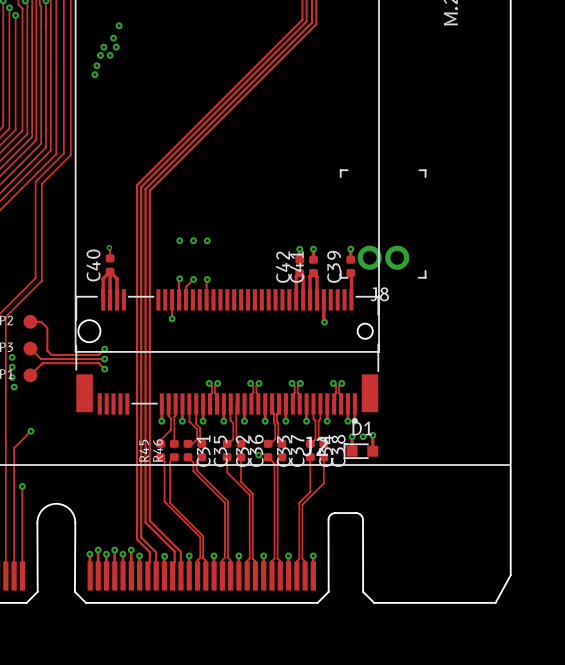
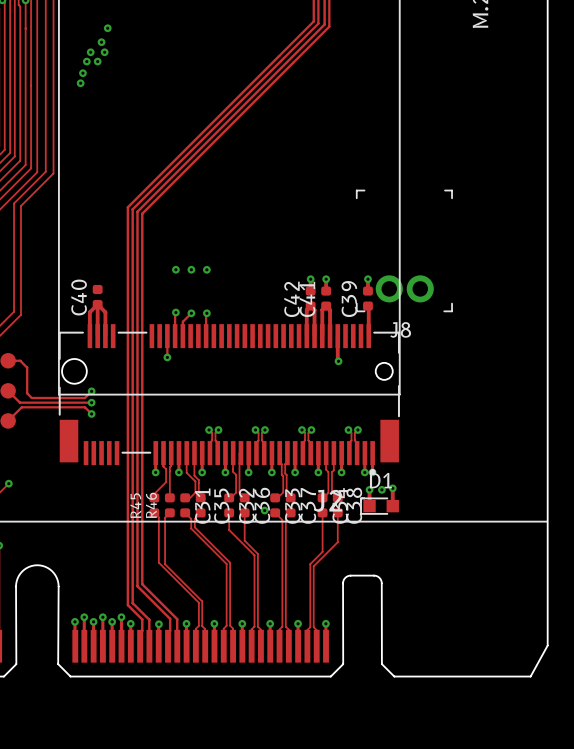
track: (109, 247) (110, 258) -> none
via: (109, 247) -> none

